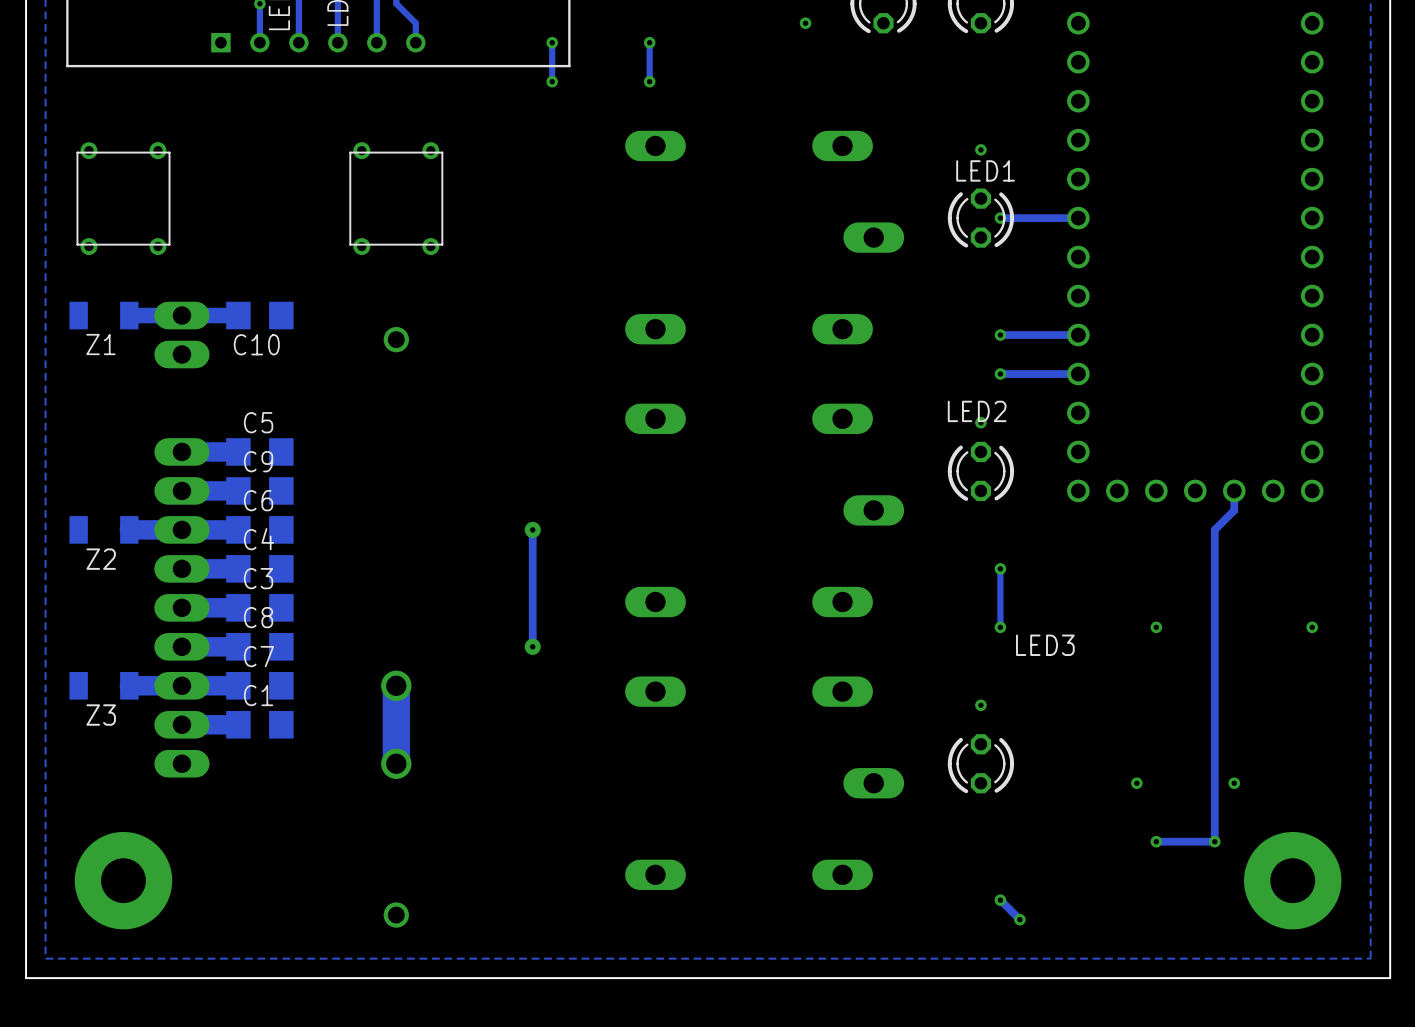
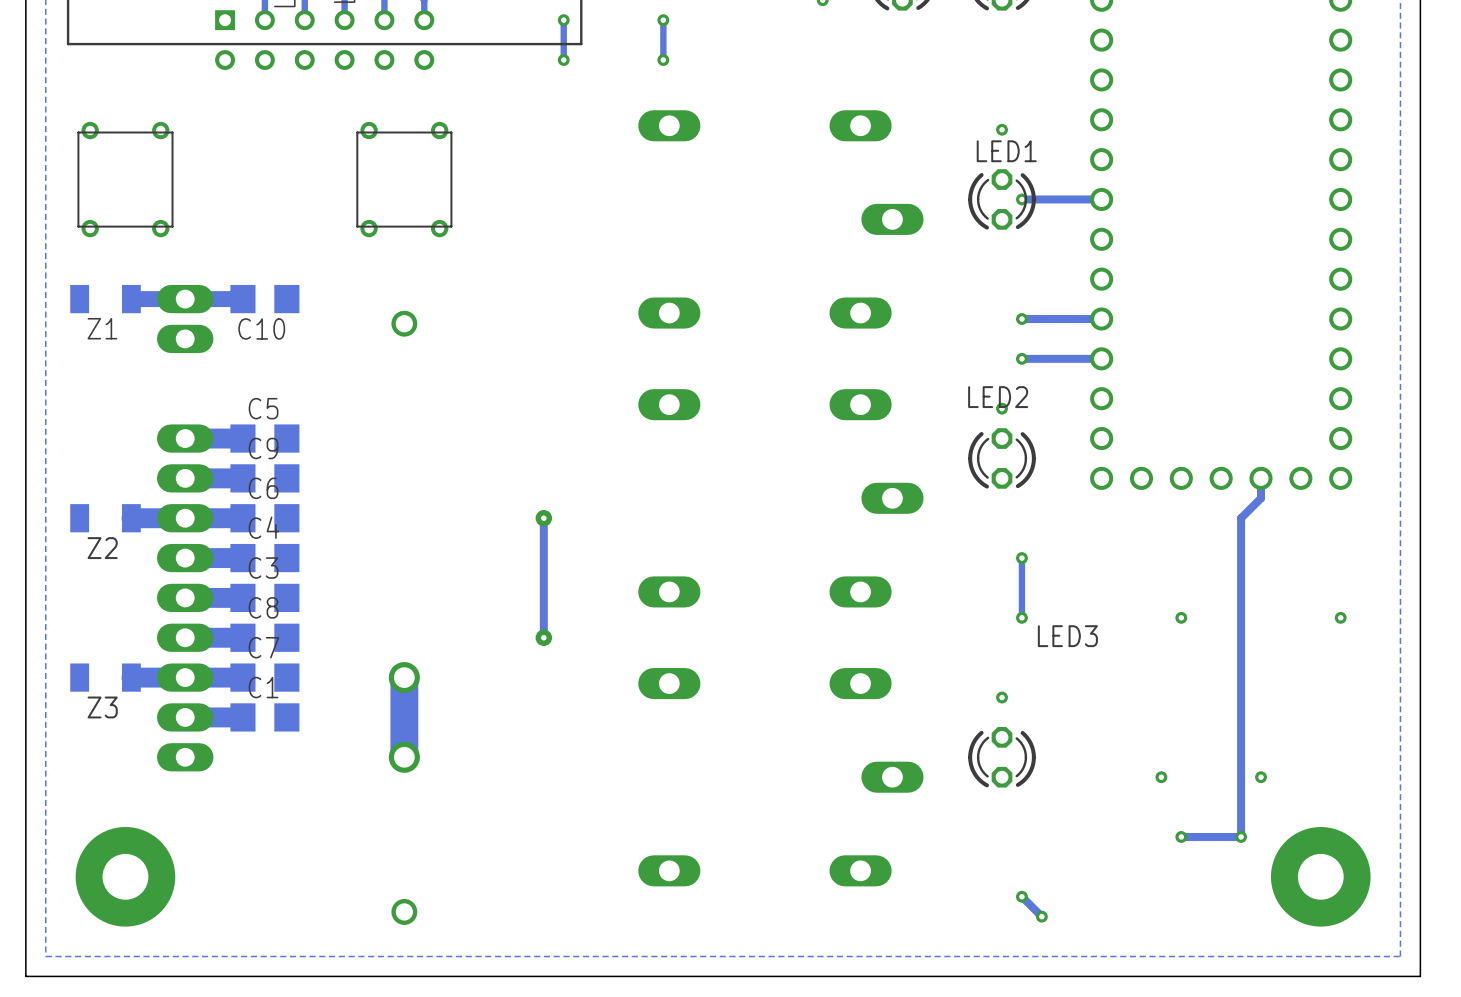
via: none -> (225, 60)
via: none -> (264, 60)
via: none -> (304, 60)
via: none -> (344, 60)
via: none -> (384, 60)
via: none -> (424, 60)

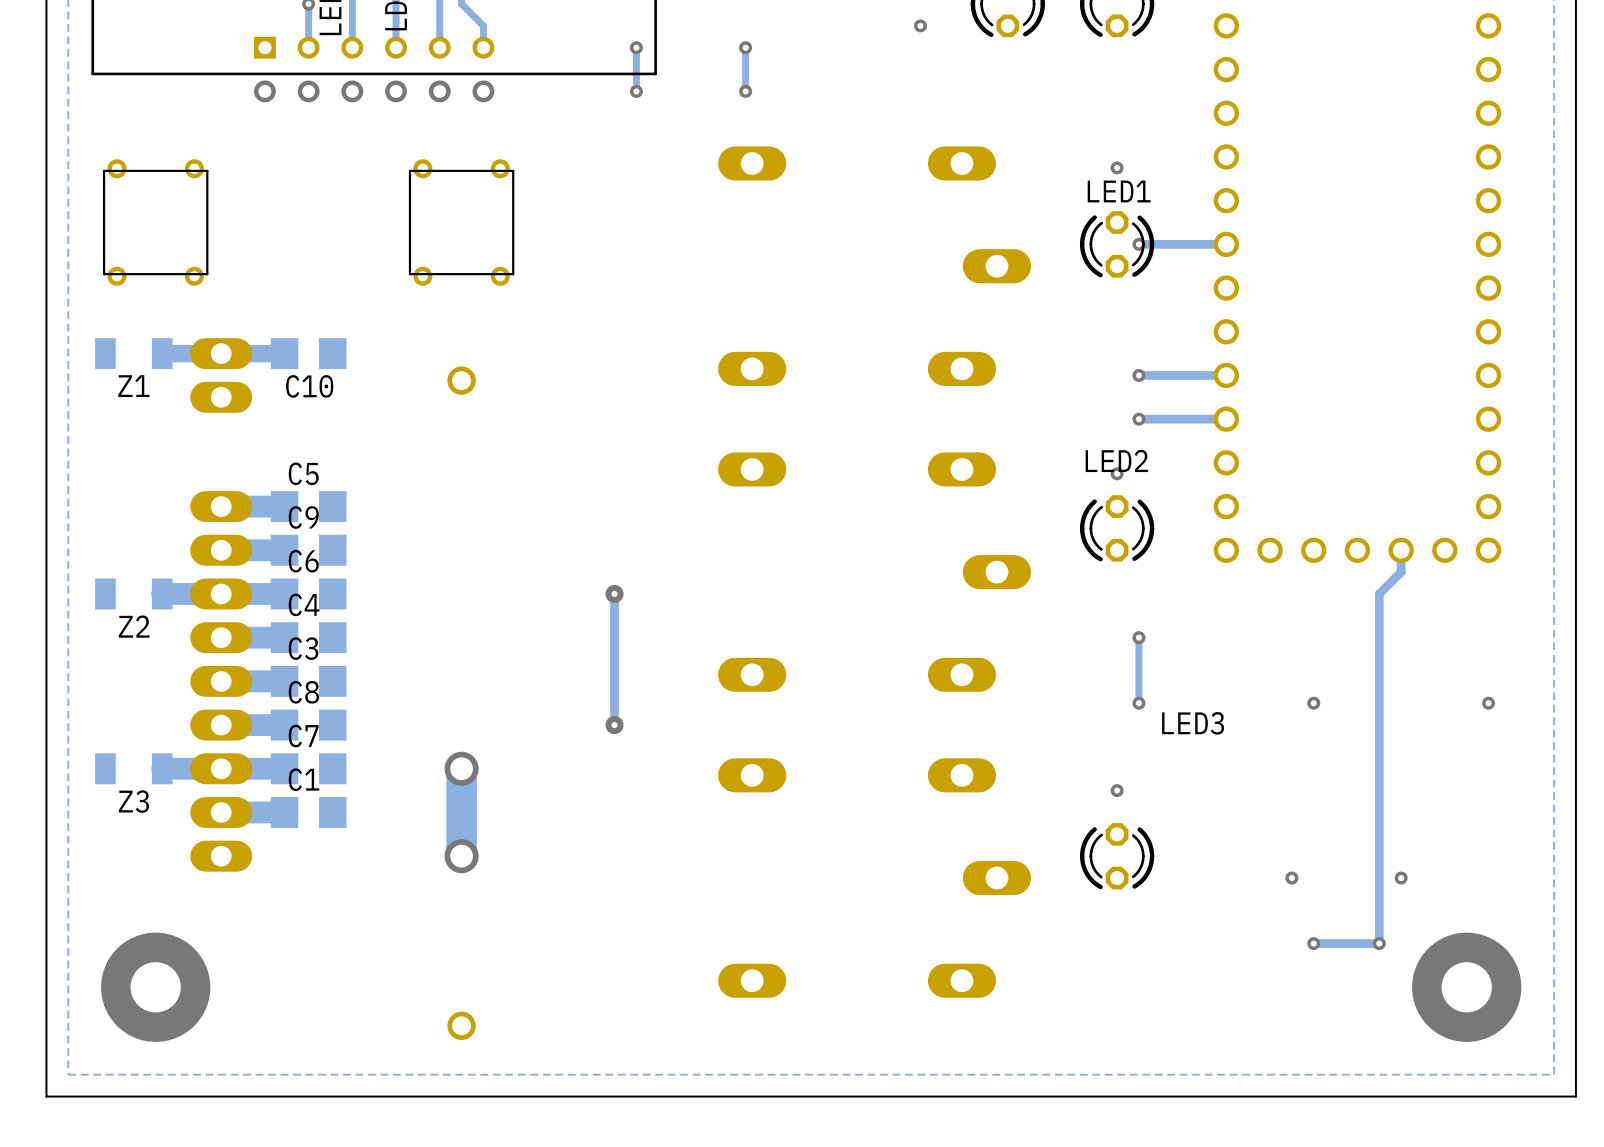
track: (1021, 896) (1041, 916) -> none
via: (1021, 896) -> none
via: (1041, 916) -> none

